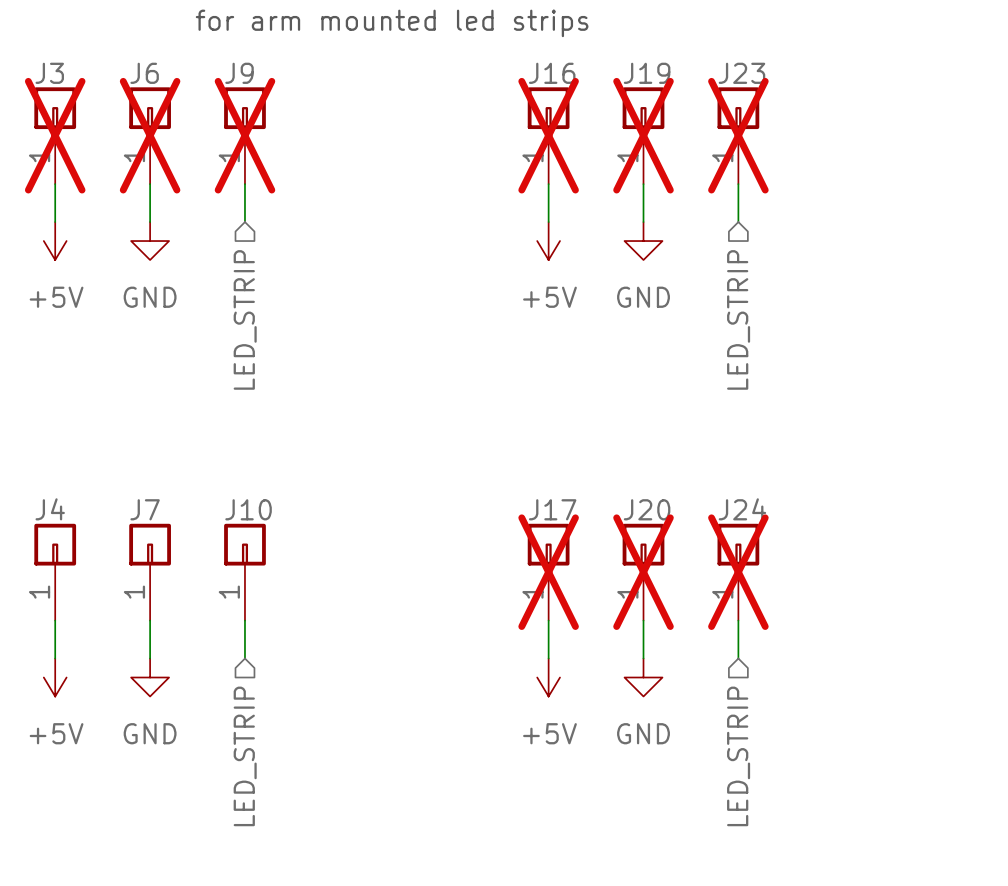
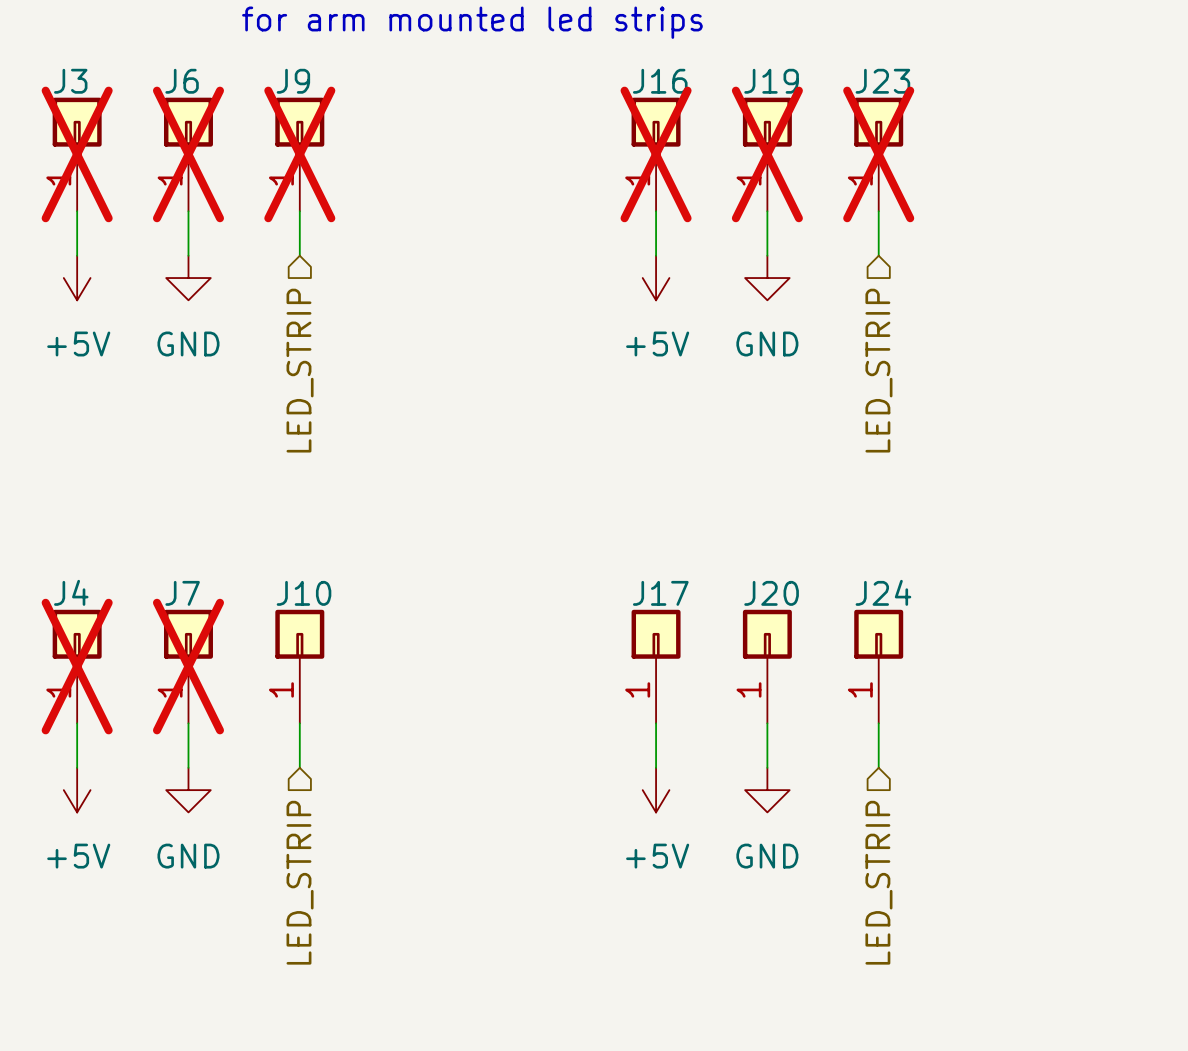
J4 do-not-place cross: none -> (77, 666)
J7 do-not-place cross: none -> (188, 666)
J17 do-not-place cross: (548, 572) -> none
J20 do-not-place cross: (643, 572) -> none
J24 do-not-place cross: (738, 572) -> none

